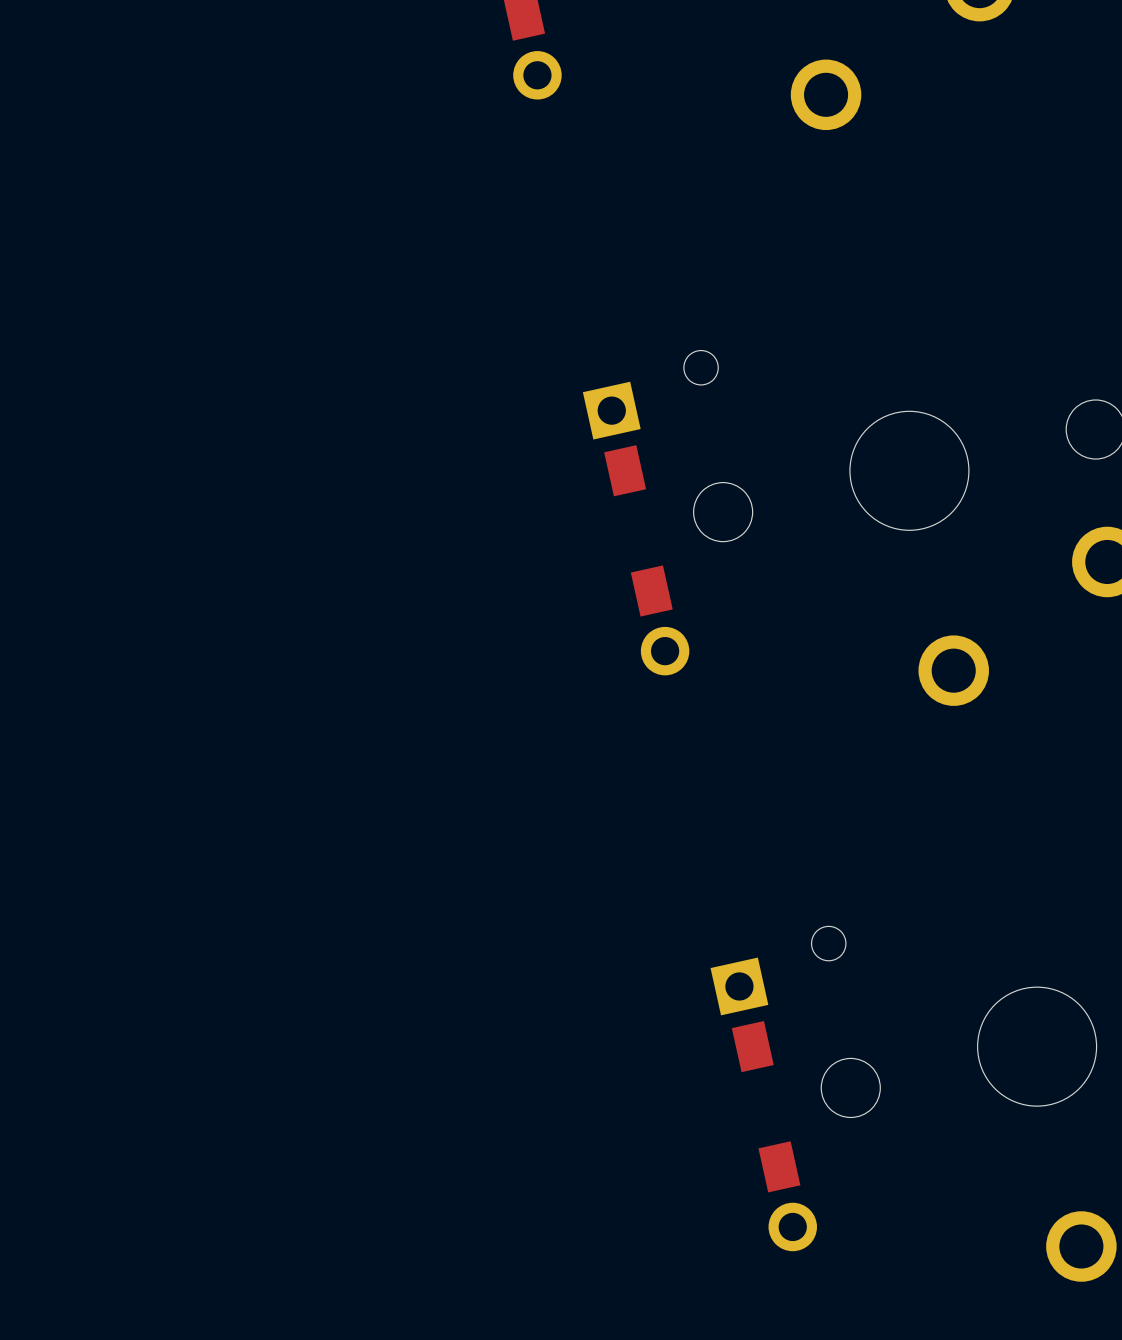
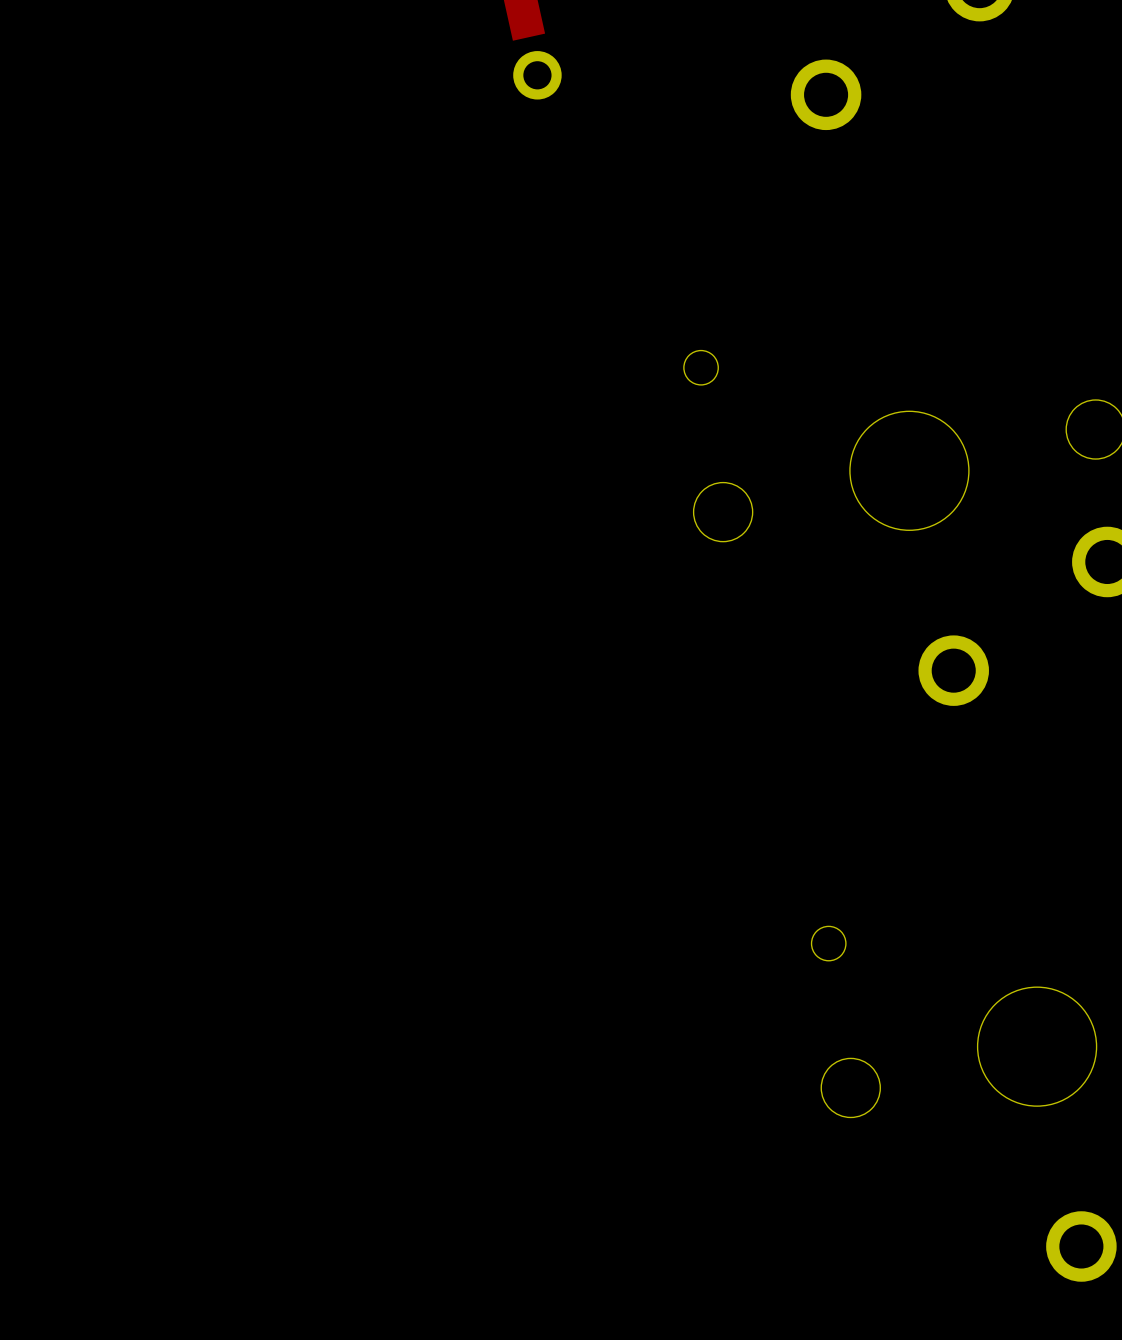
part: (636, 528) -> none
part: (763, 1104) -> none

